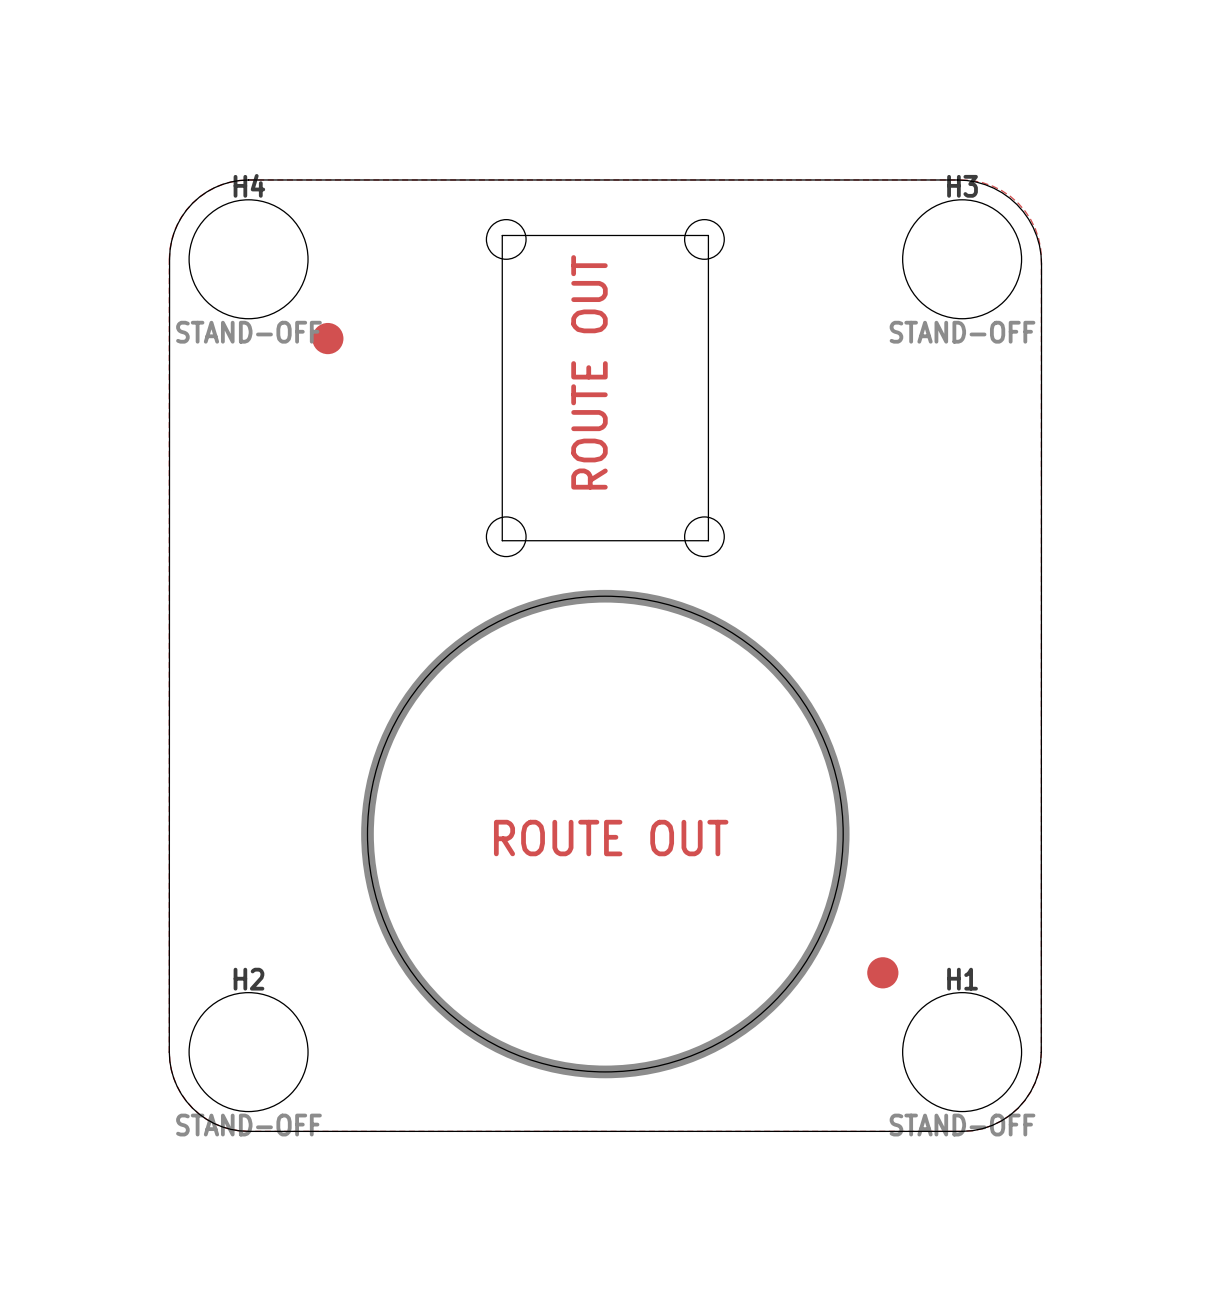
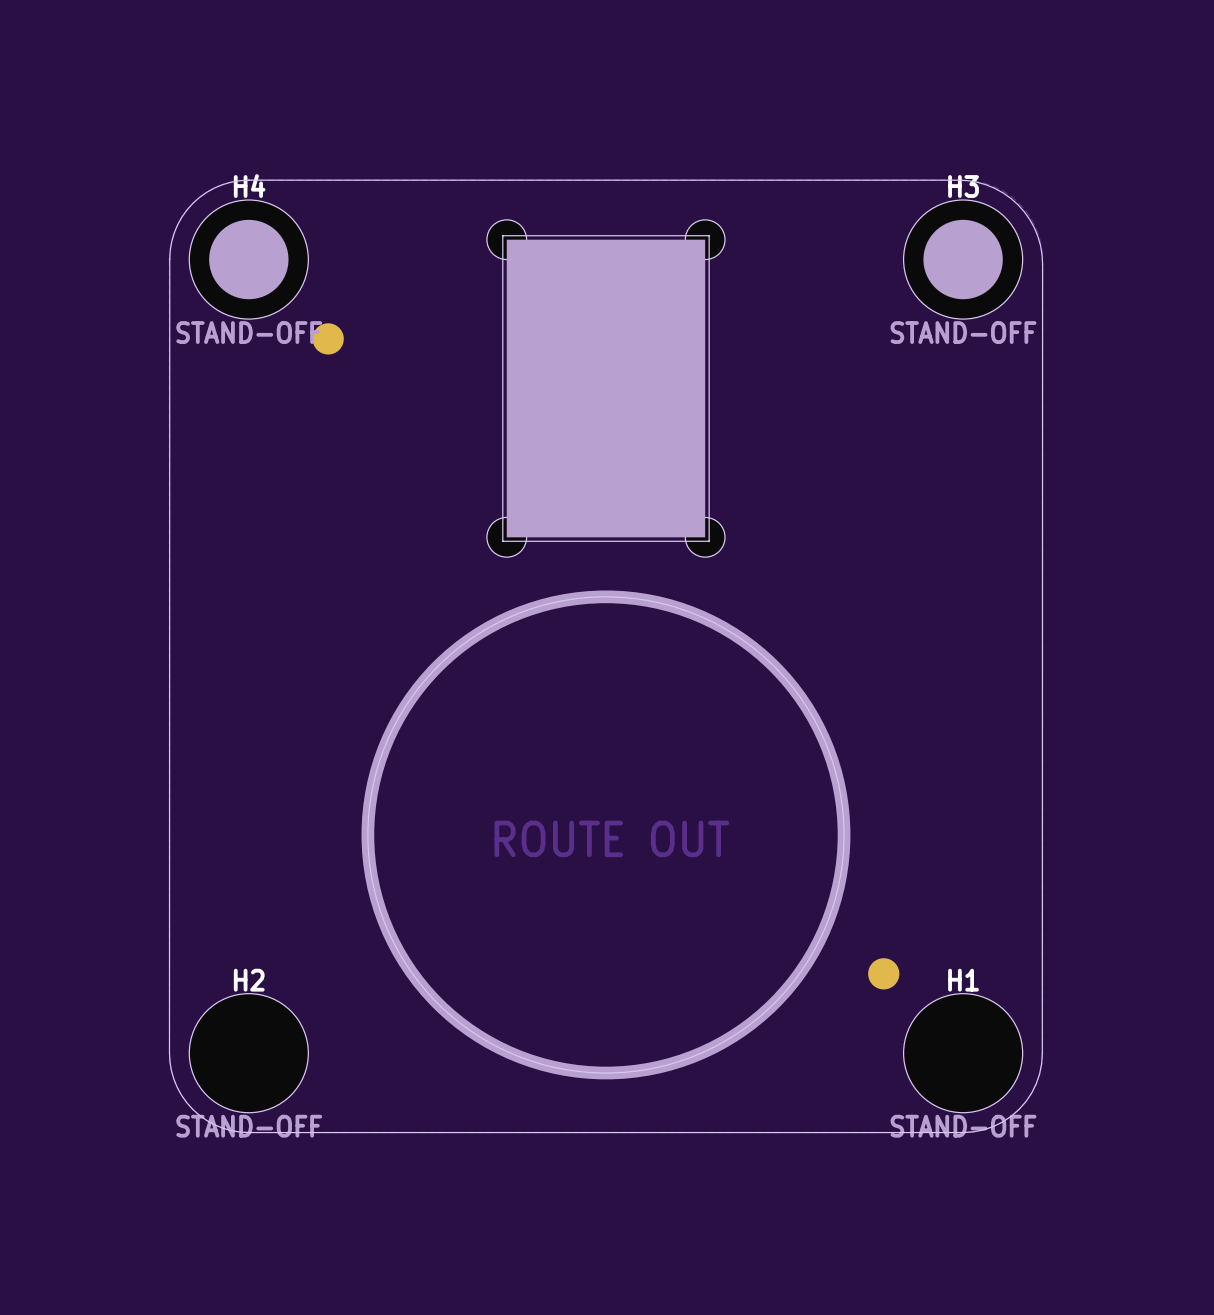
drawing: none -> [209, 219, 289, 300]
drawing: none -> [923, 219, 1003, 300]
drawing: none -> [506, 239, 706, 538]

